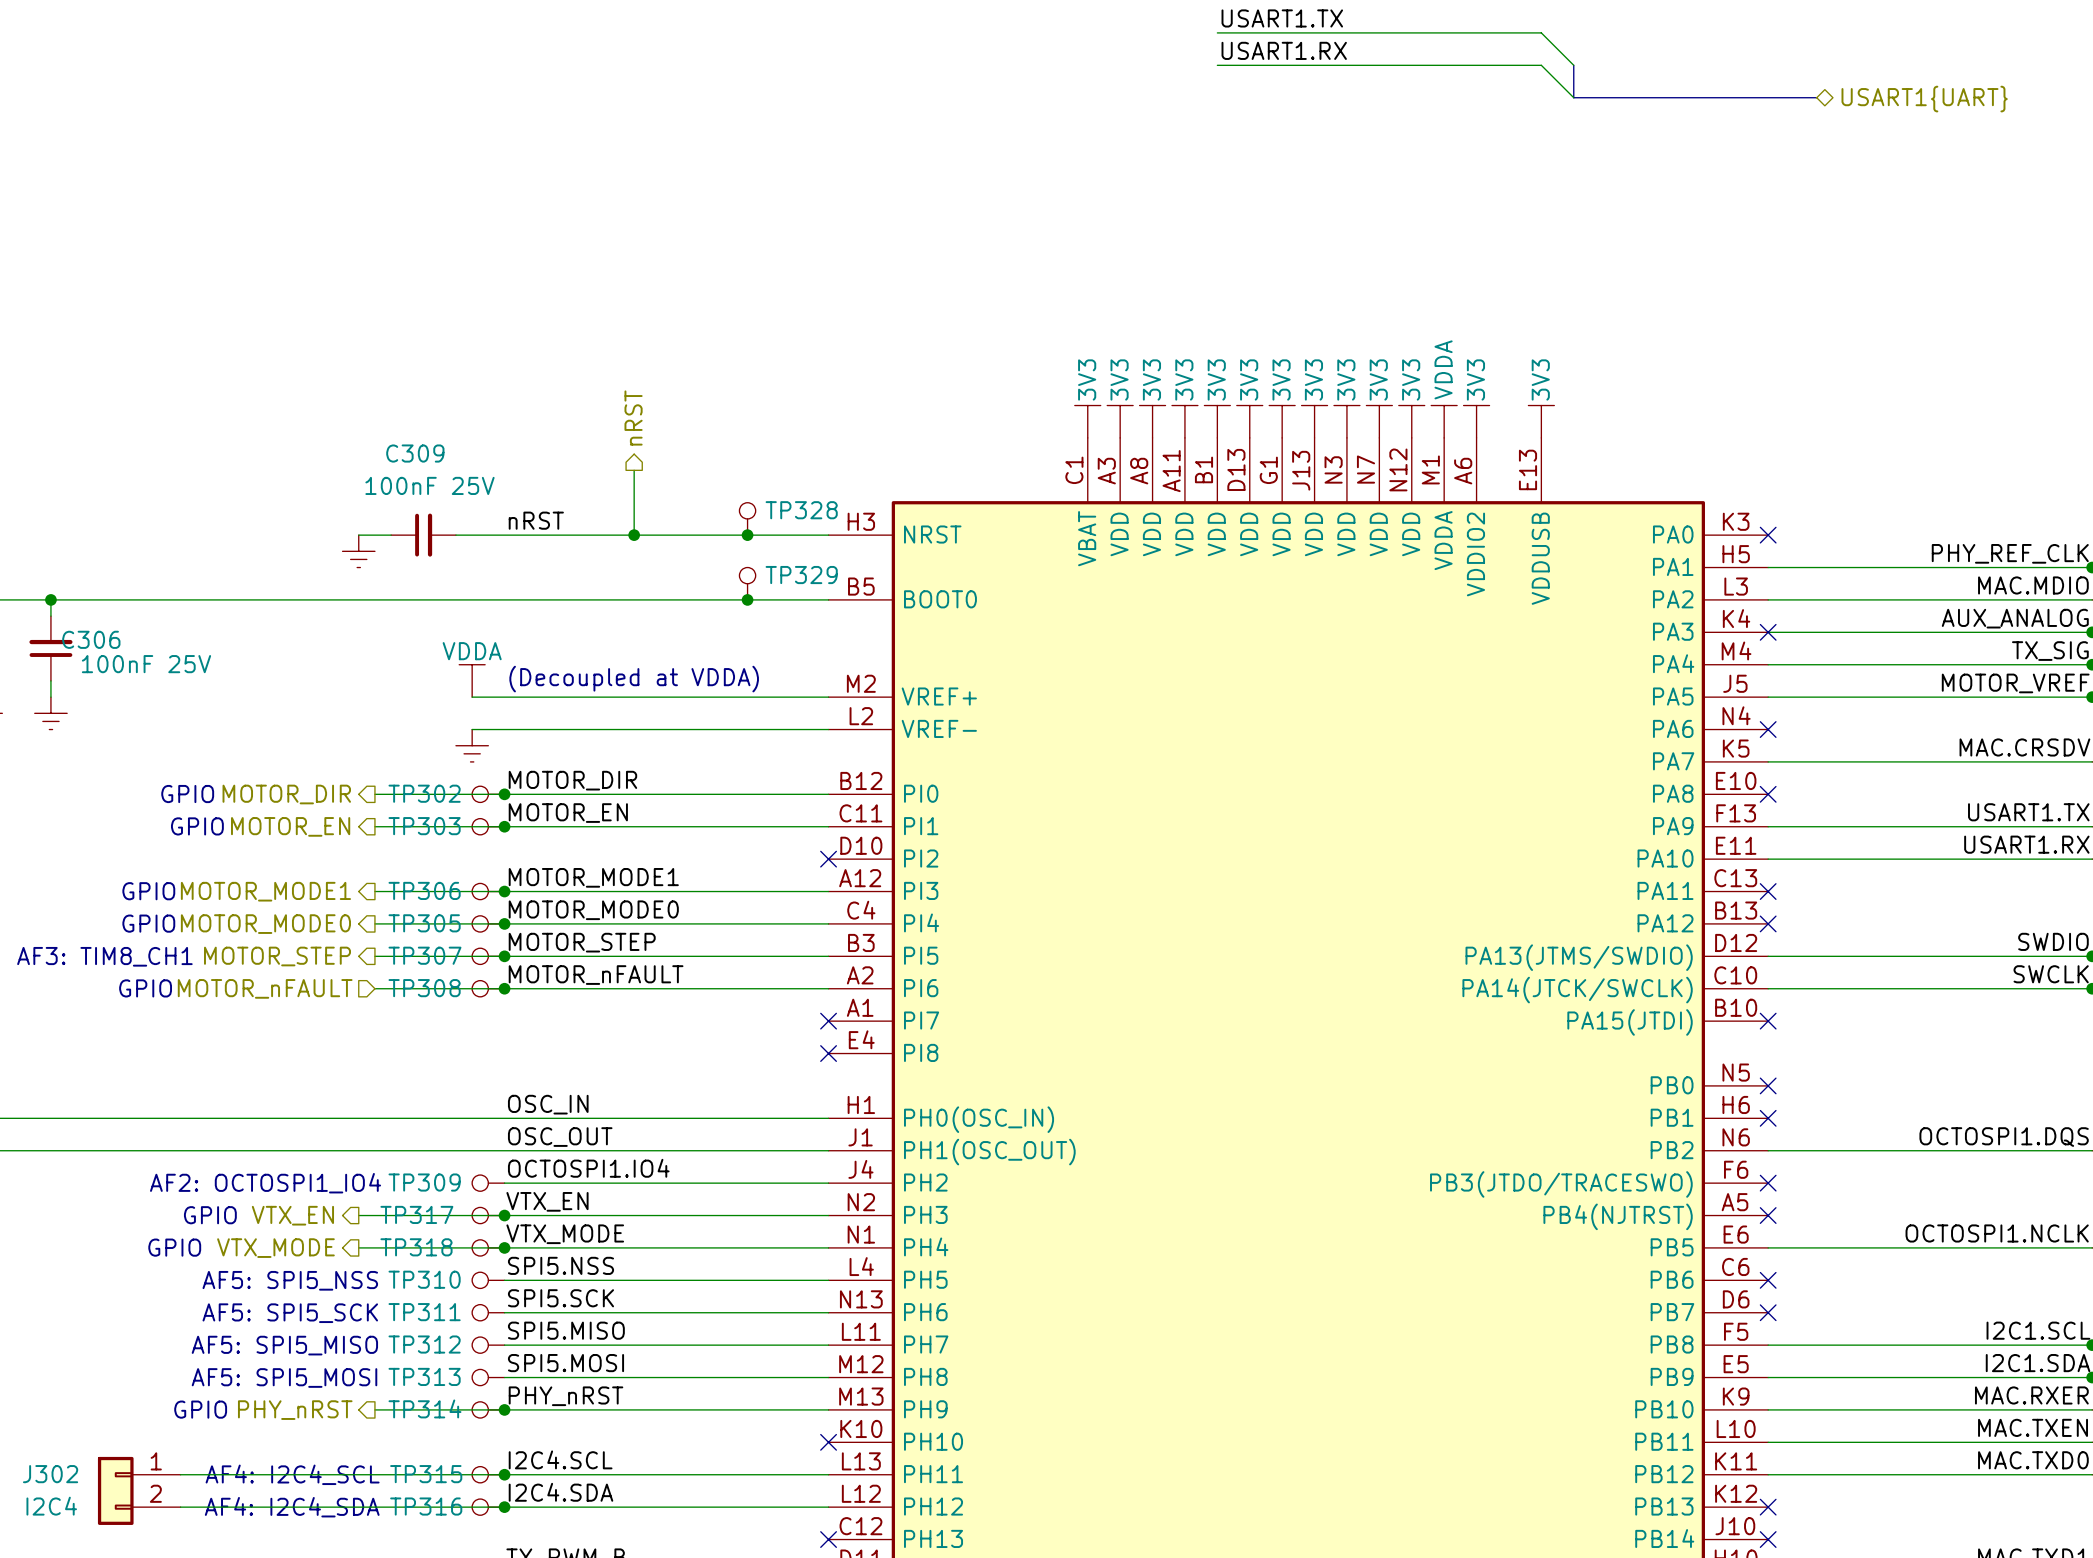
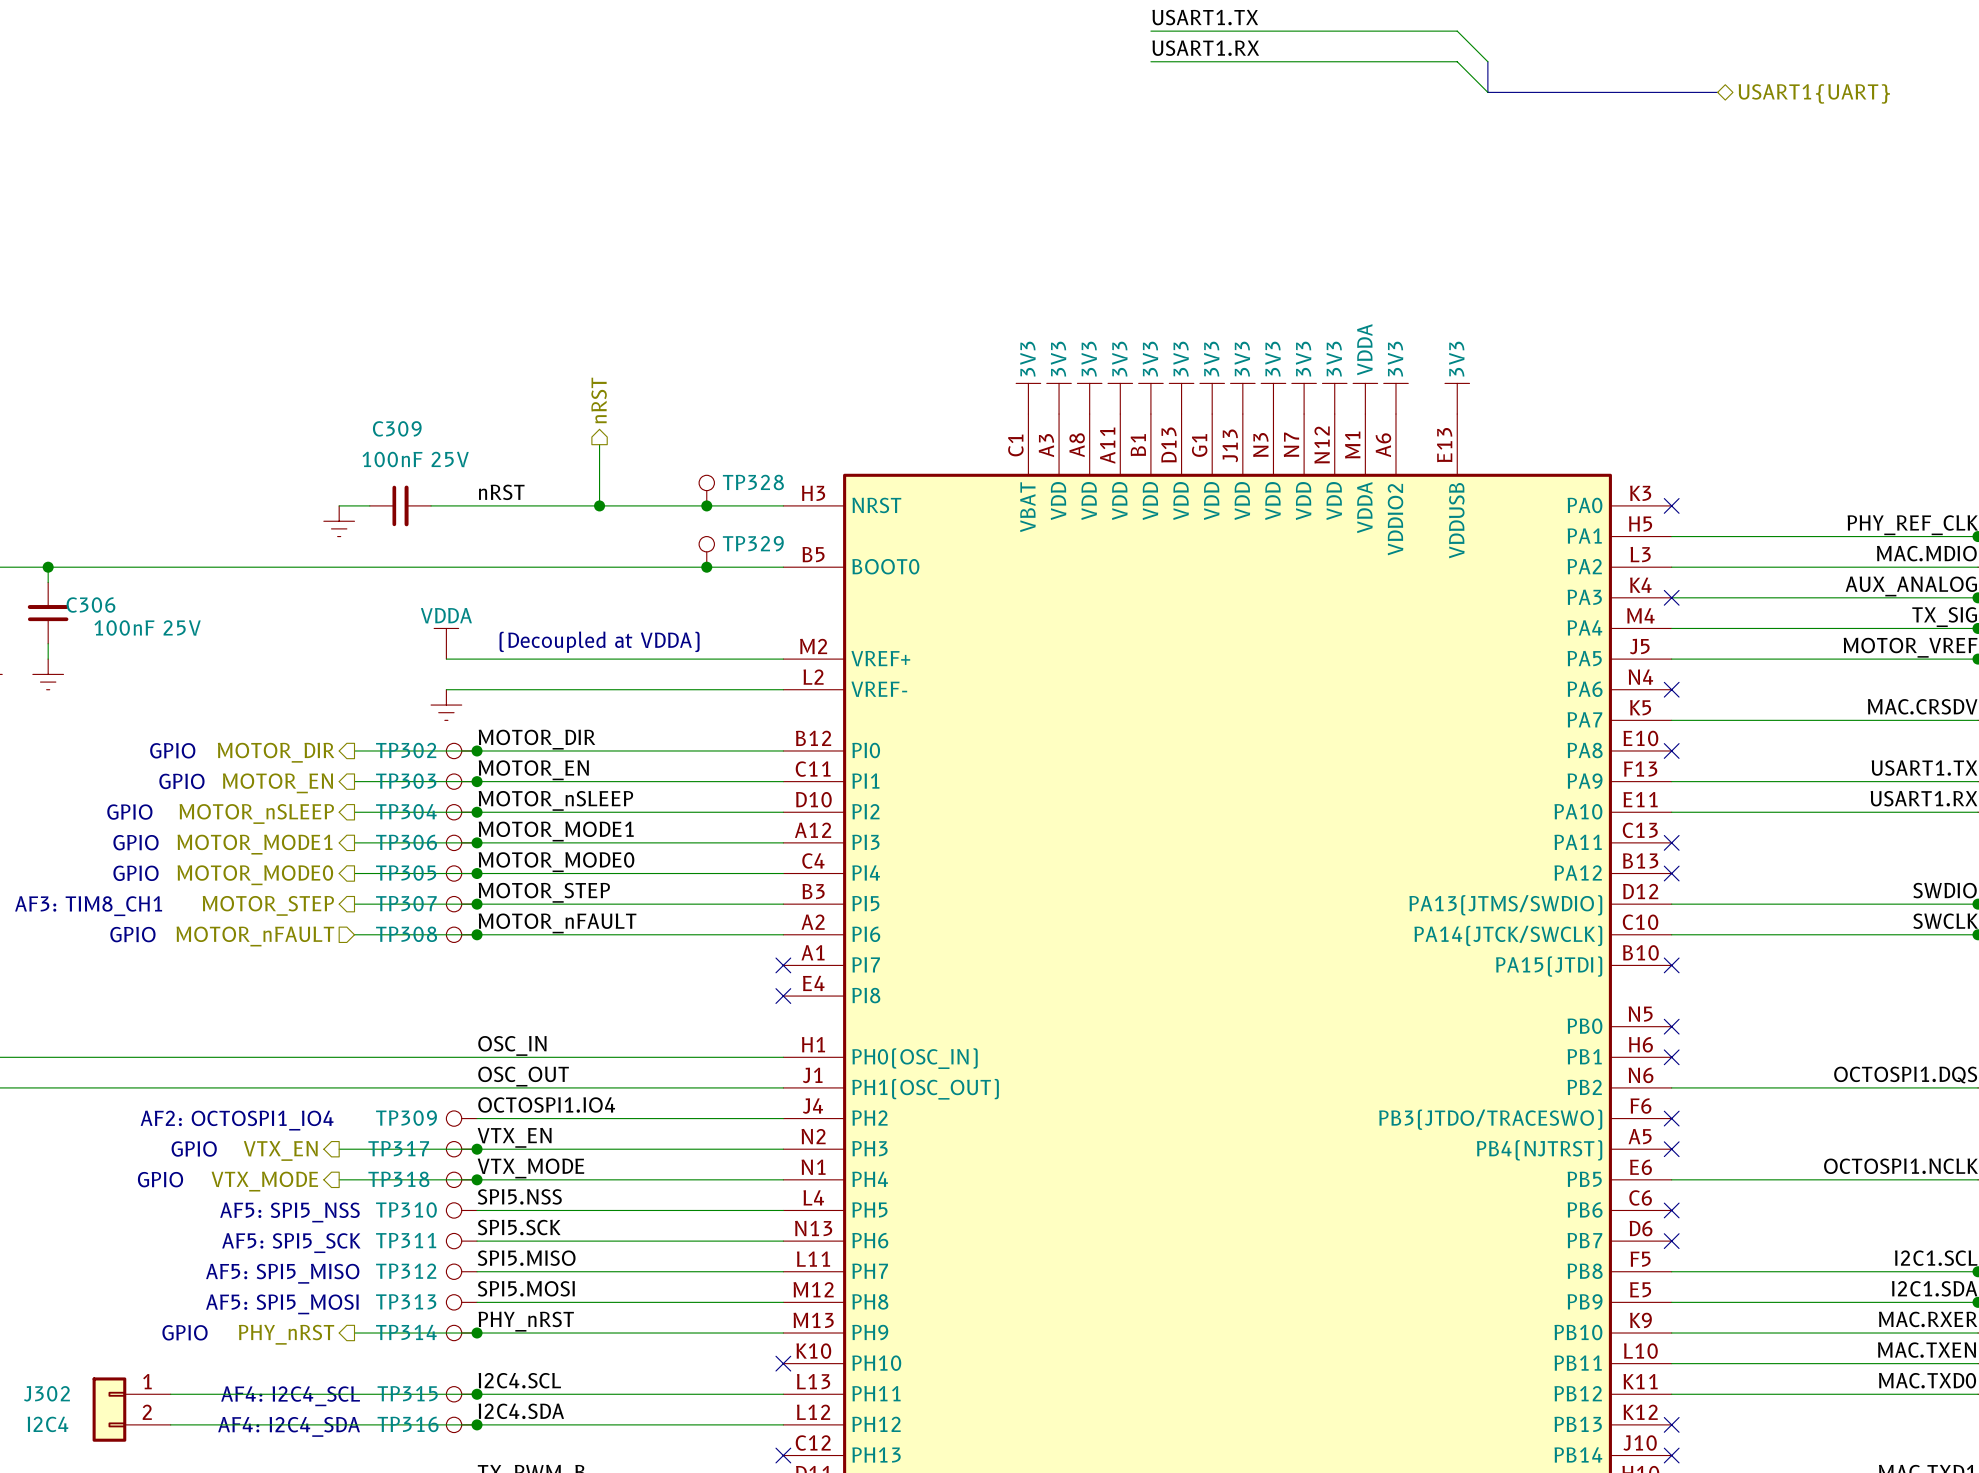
label: none -> MOTOR_nSLEEP (555, 800)
text: none -> GPIO (129, 812)
hierarchical label: none -> MOTOR_nSLEEP (256, 813)
wire: none -> (354, 812) (783, 812)
TP304: none -> (461, 812)
junction: none -> (477, 812)
no-connect mark: (828, 859) -> none

